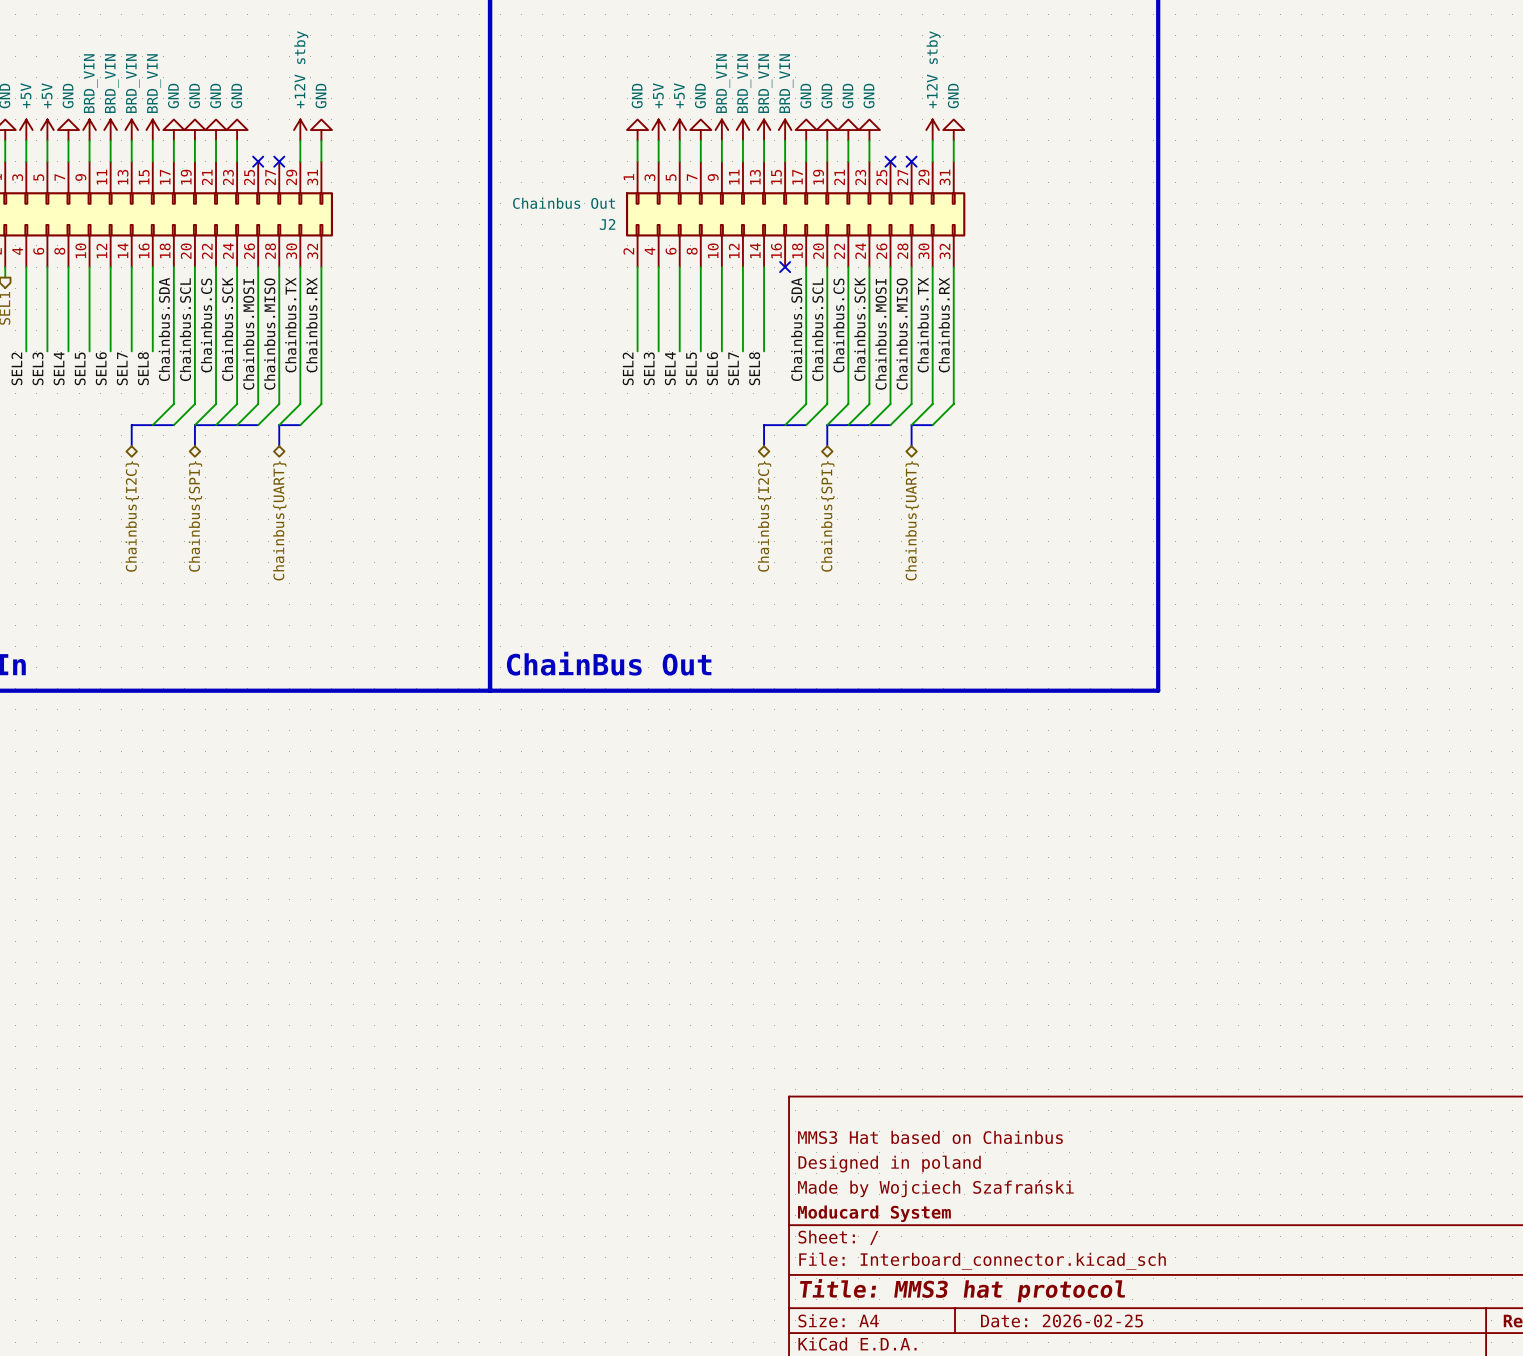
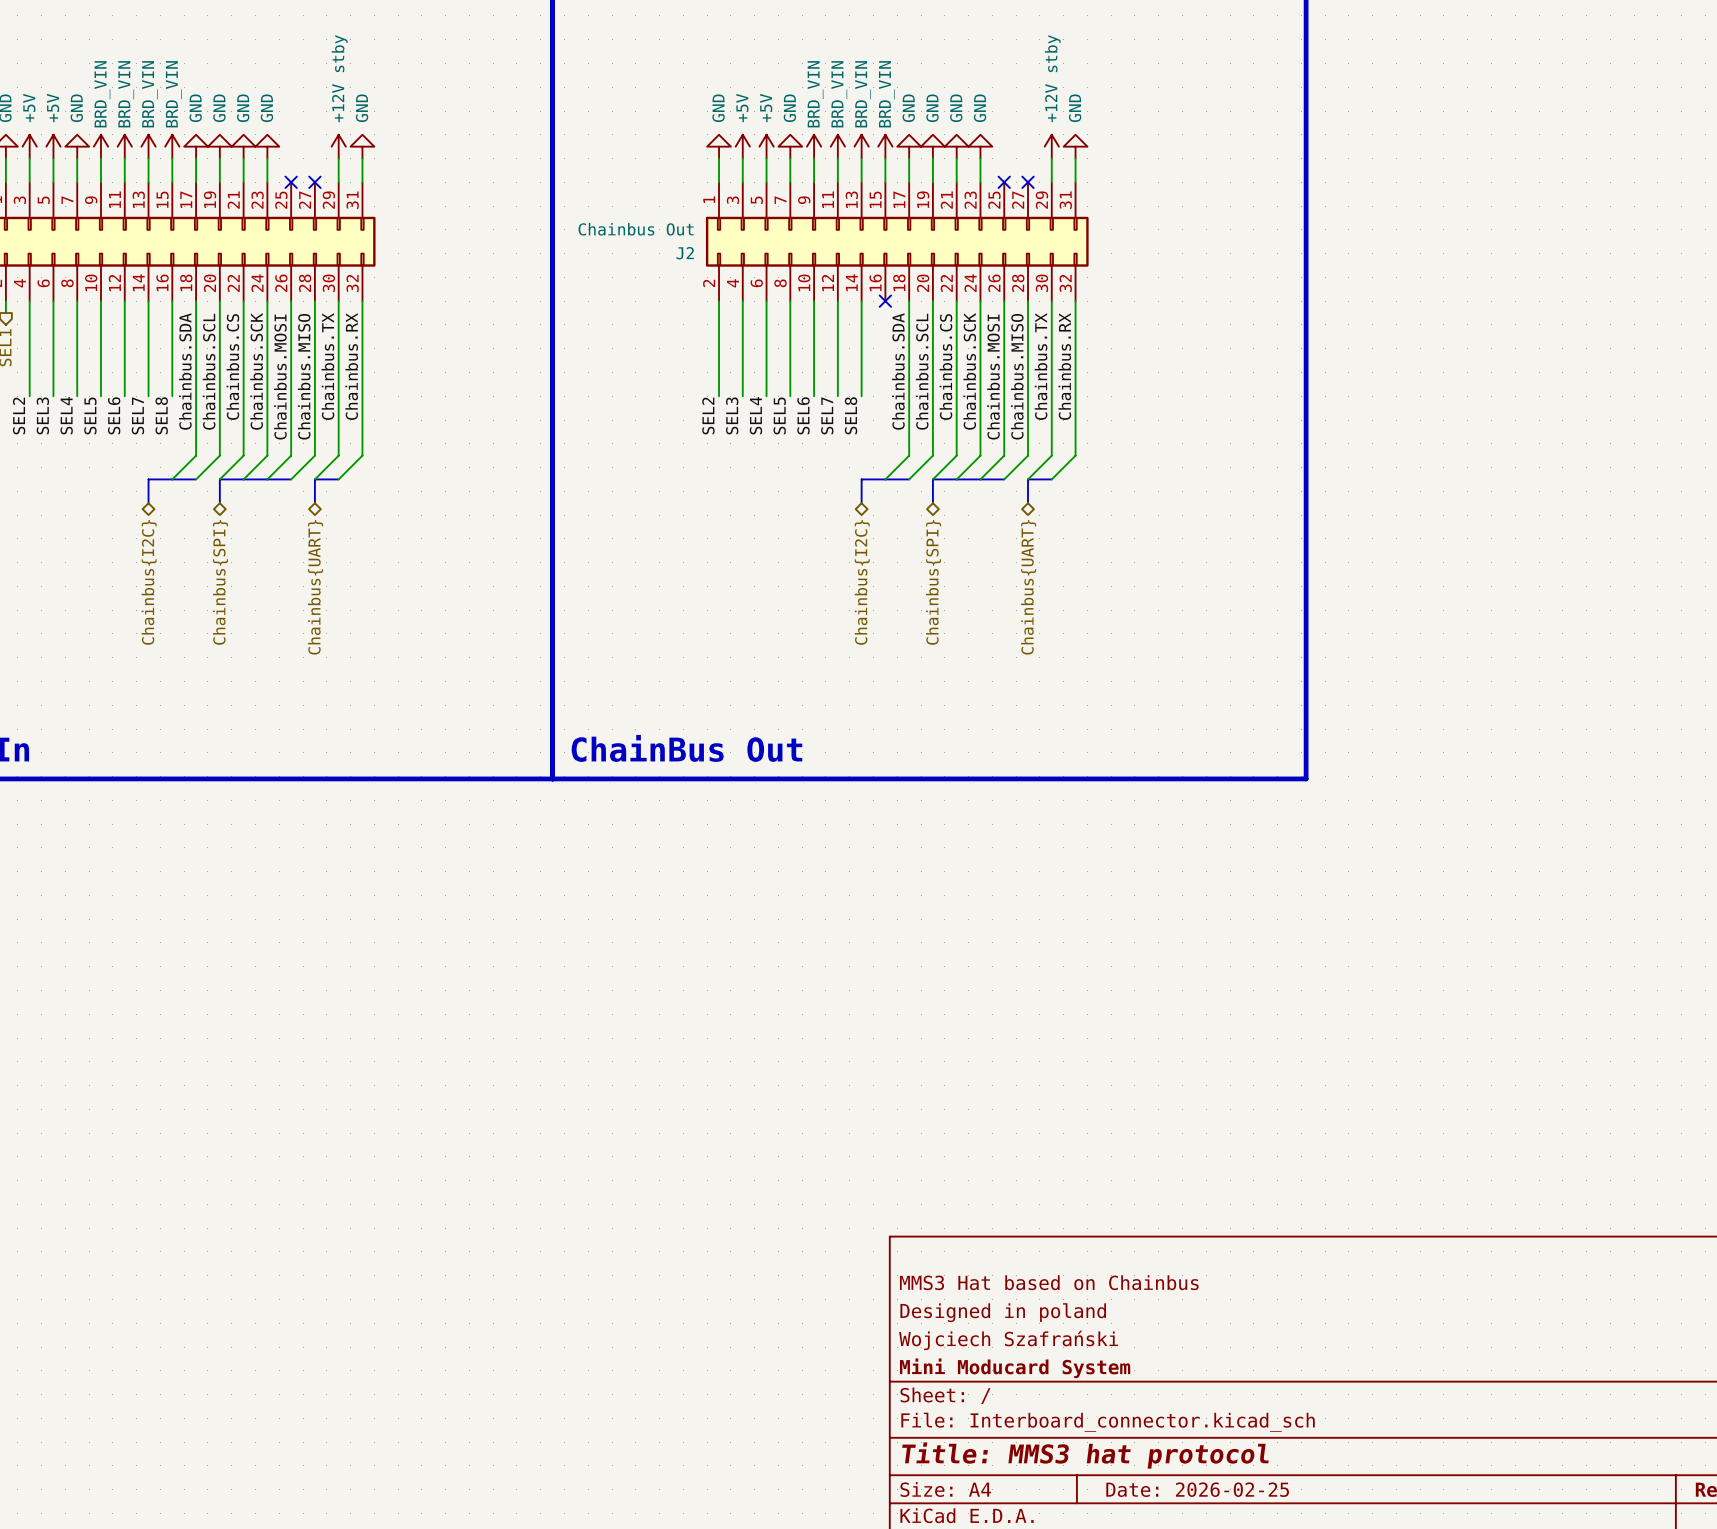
title block: Made by Wojciech Szafrański (935, 1188) -> Wojciech Szafrański (1008, 1340)
title block: Moducard System (874, 1213) -> Mini Moducard System (1015, 1368)

